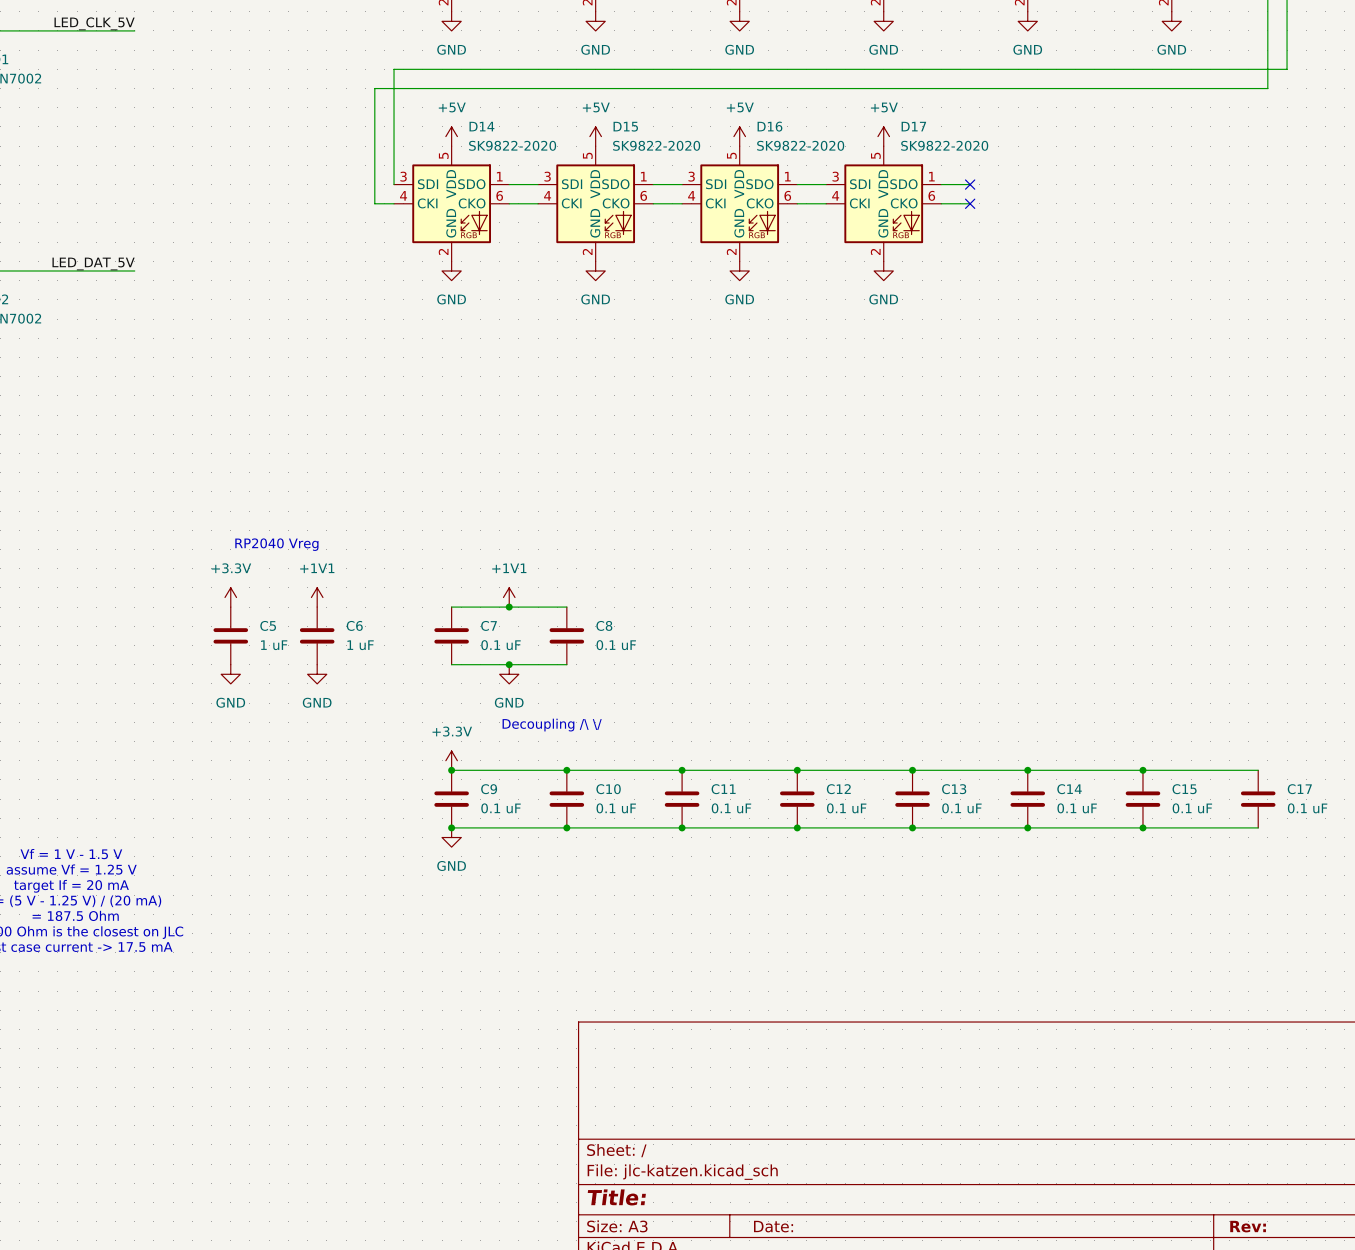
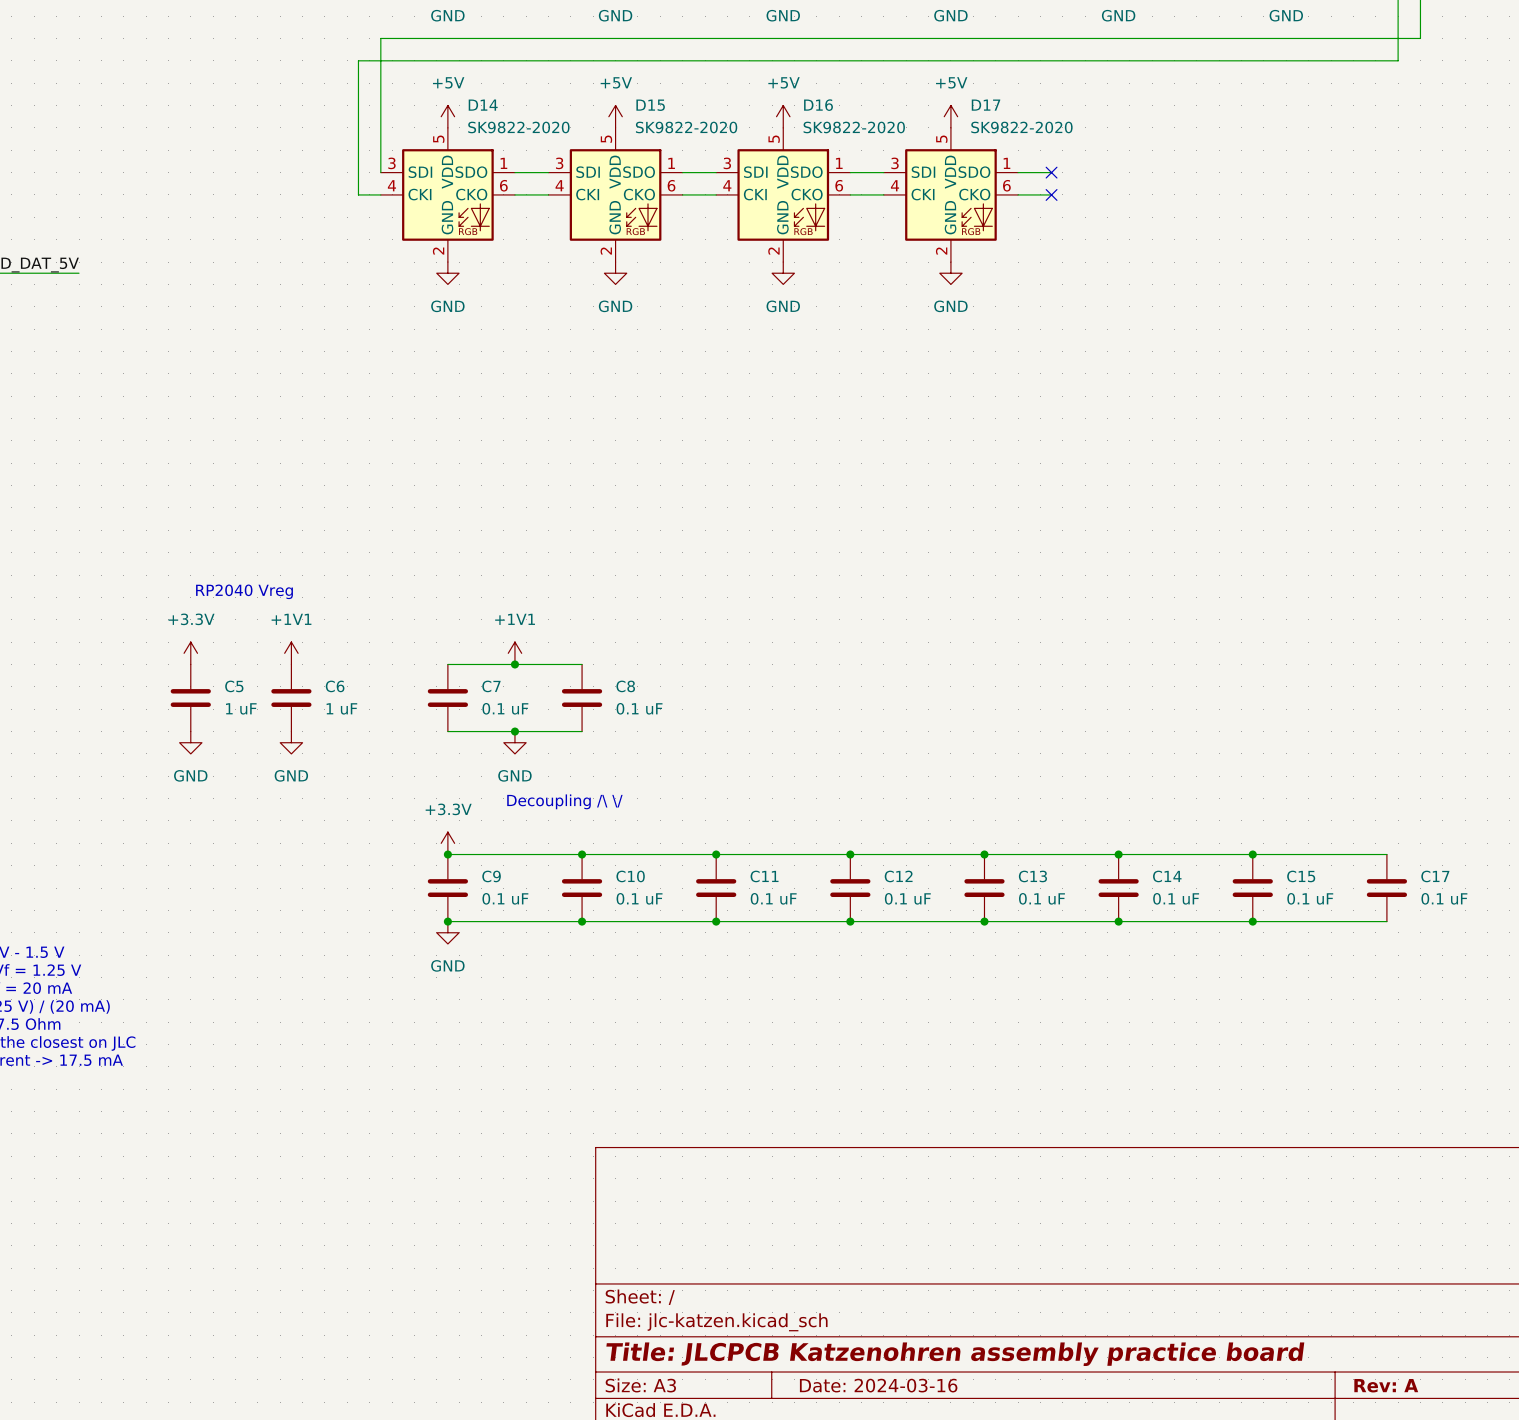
title block: Title: (616, 1197) -> Title: JLCPCB Katzenohren assembly practice board (955, 1354)
title block: Date: (773, 1226) -> Date: 2024-03-16 (878, 1385)
title block: Rev: (1248, 1226) -> Rev: A (1386, 1385)

